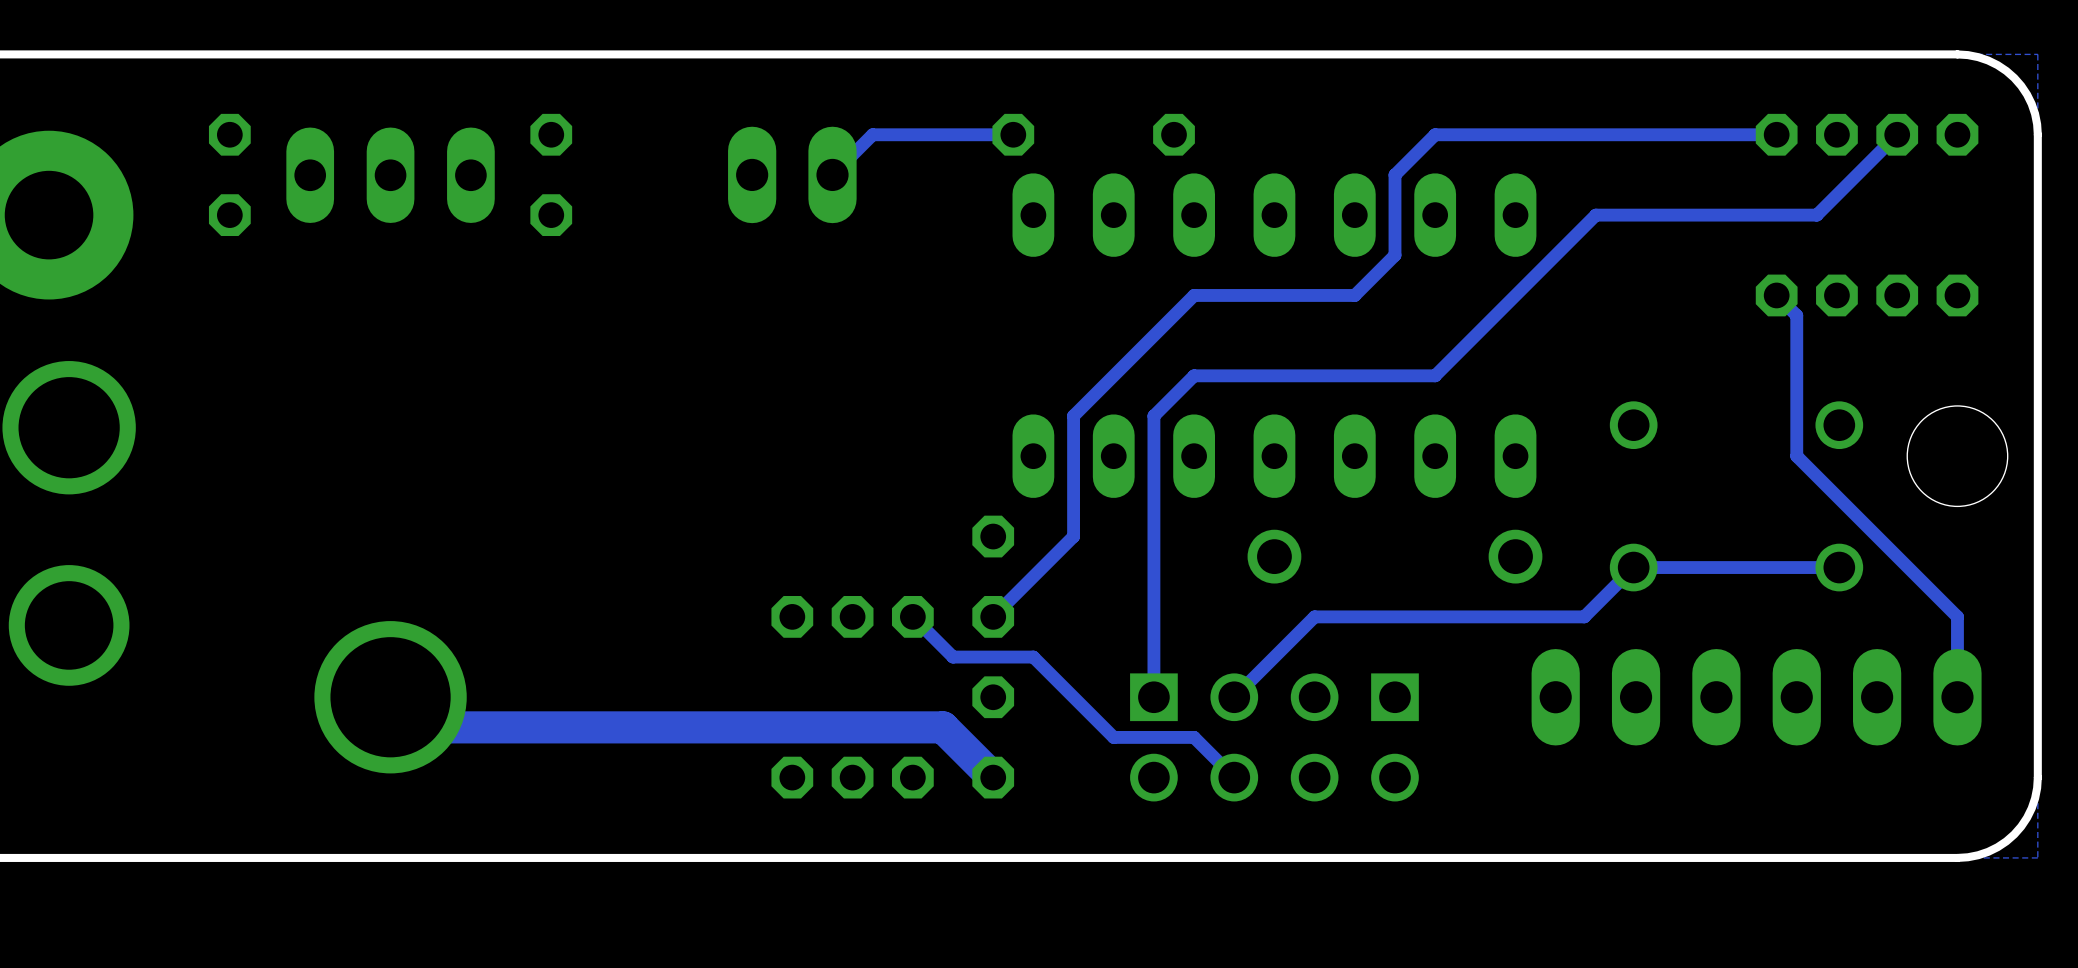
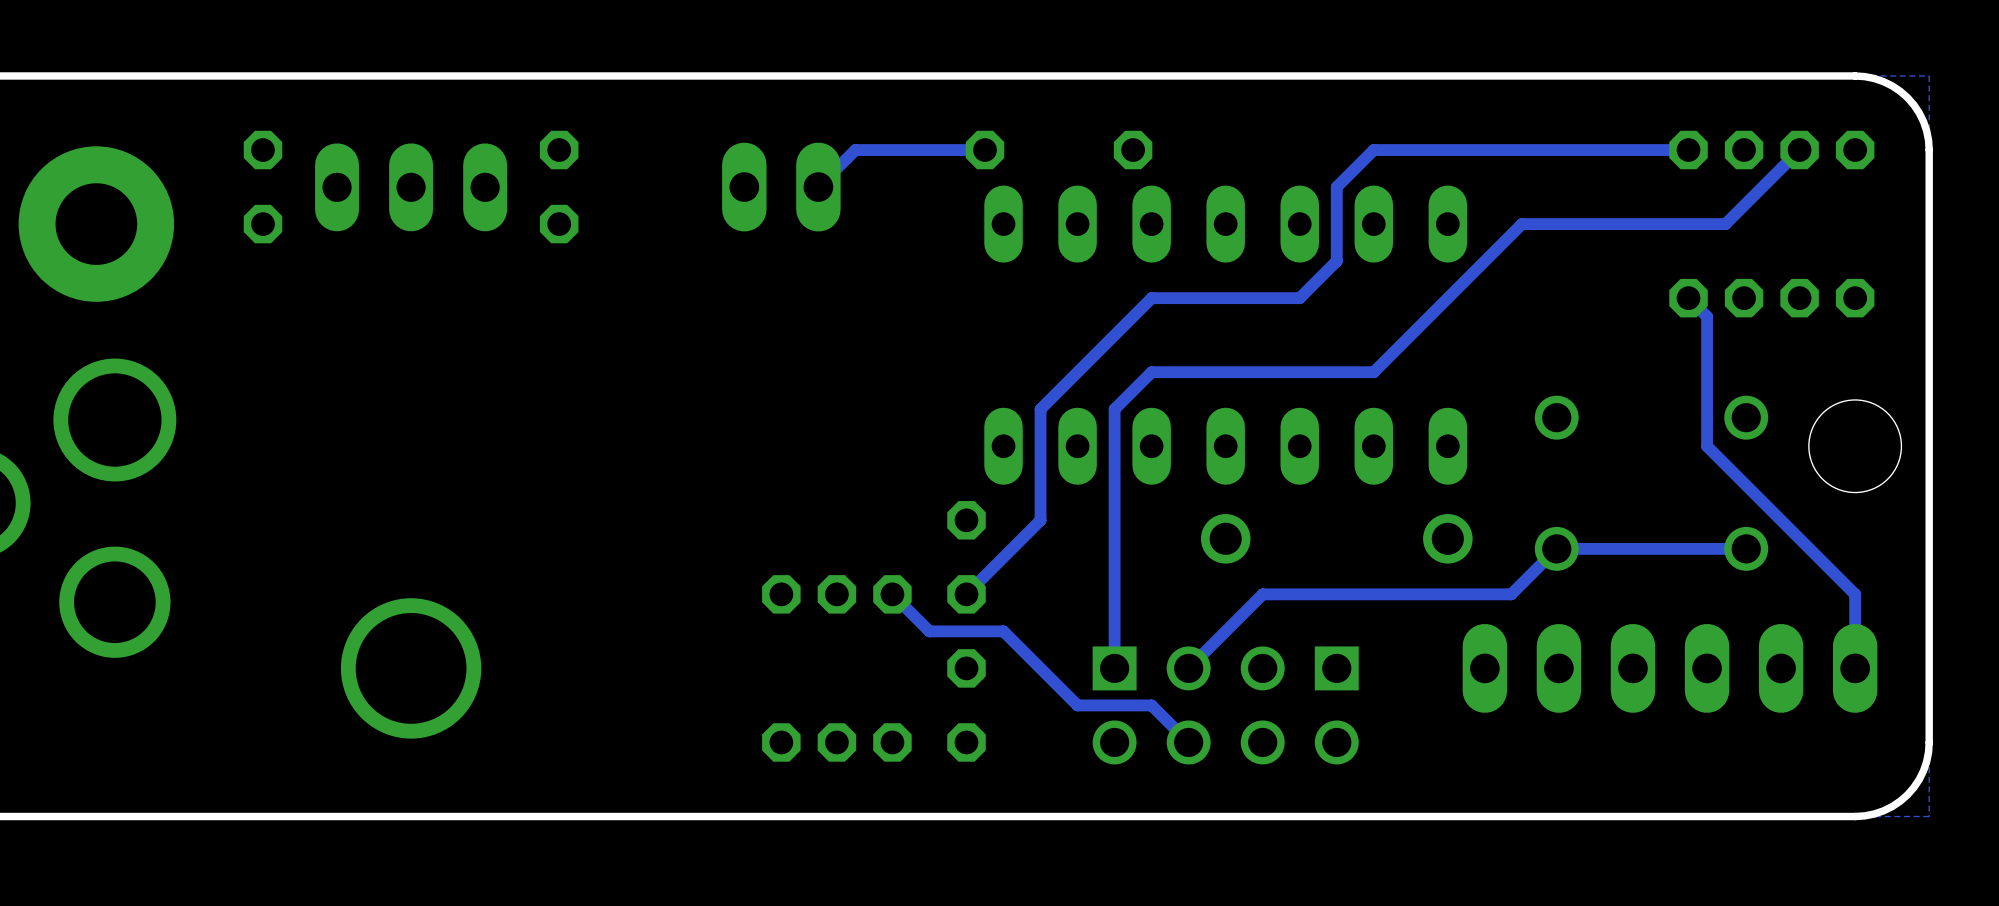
track: (390, 697) (420, 727) (942, 727) (993, 777) -> none

